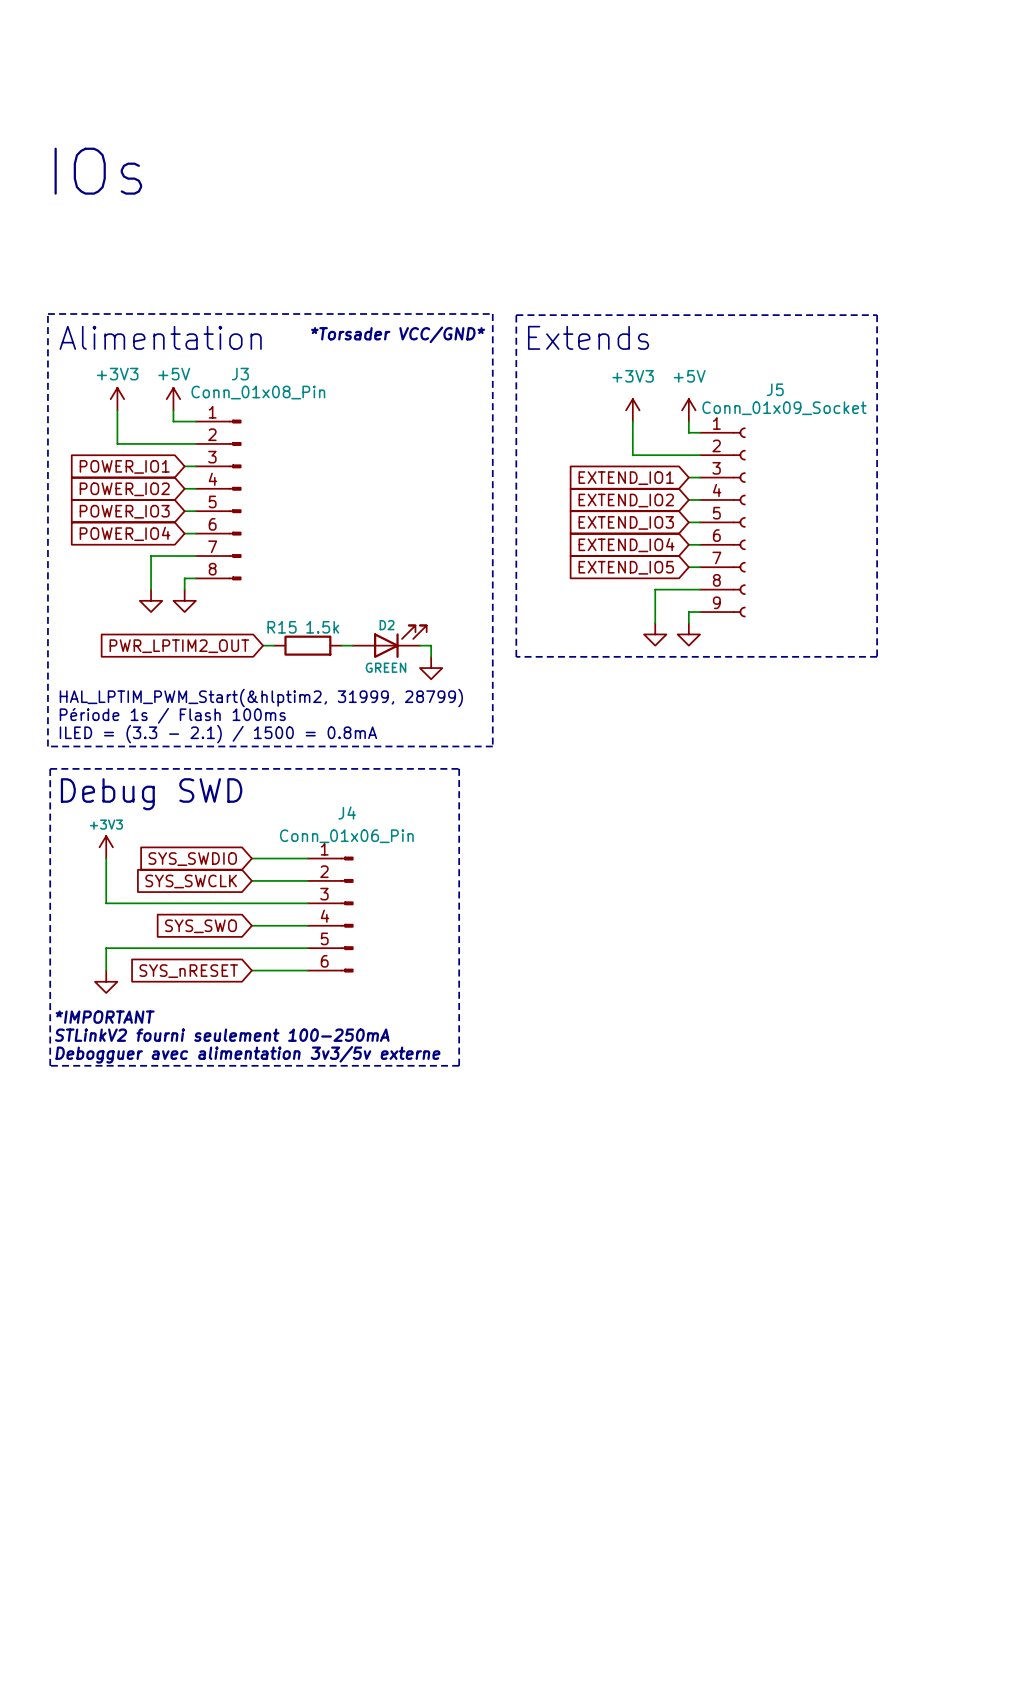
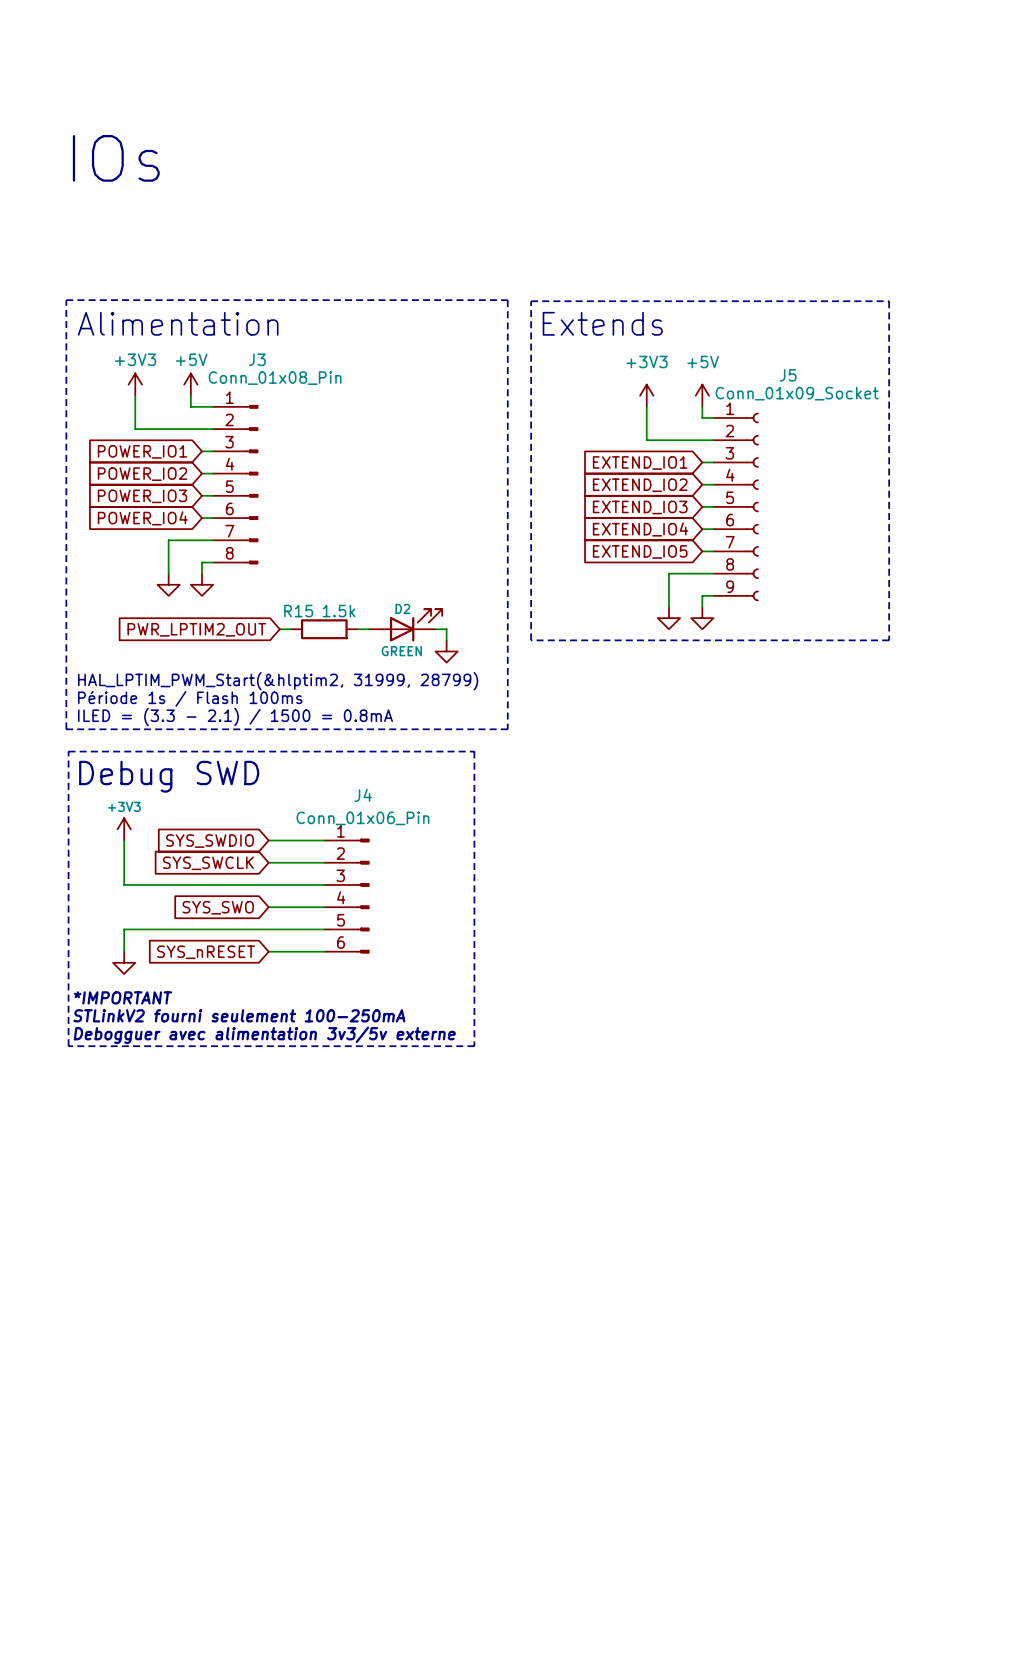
text: *Torsader VCC/GND* (398, 334) -> none

